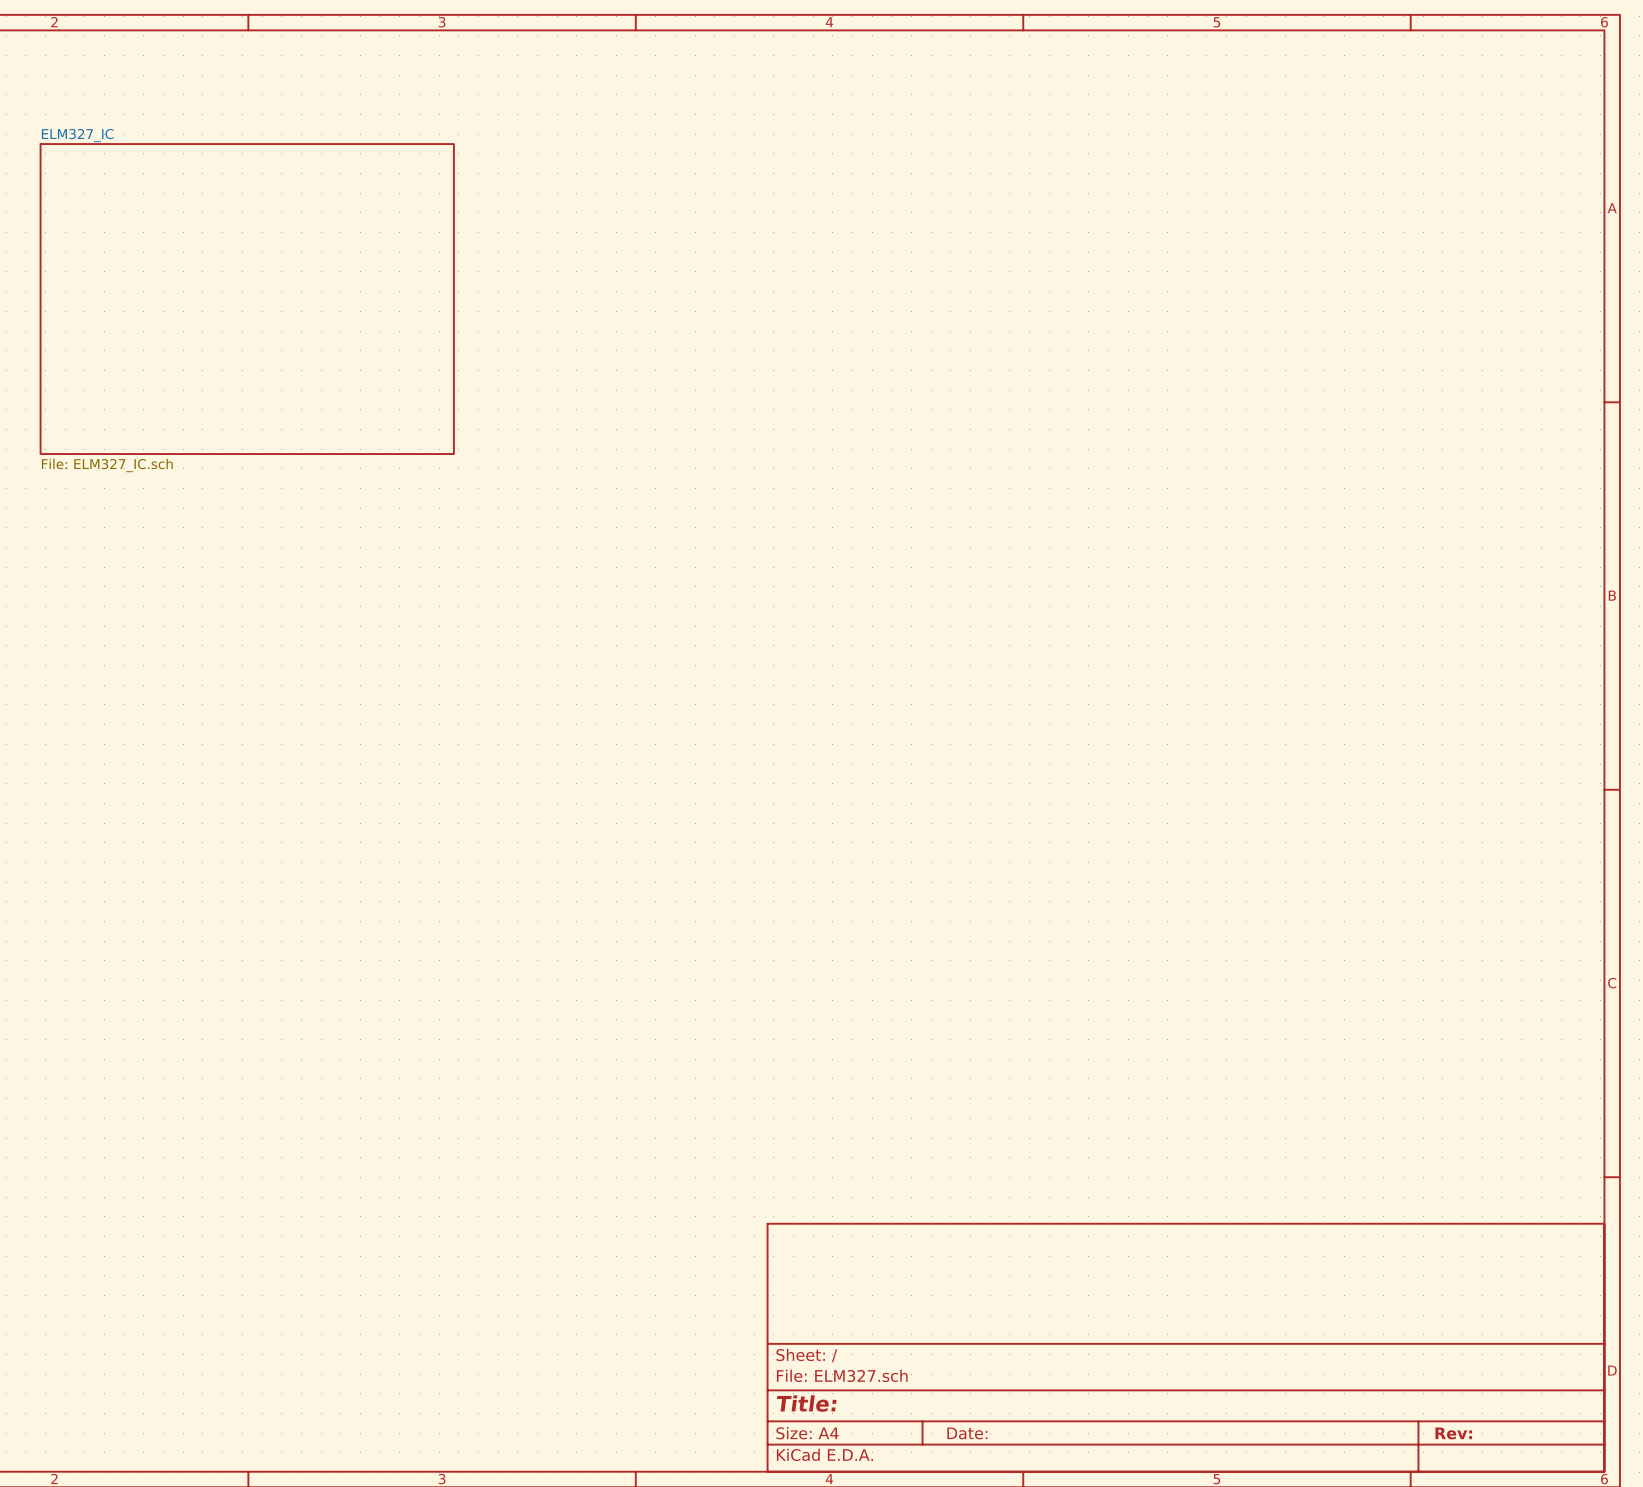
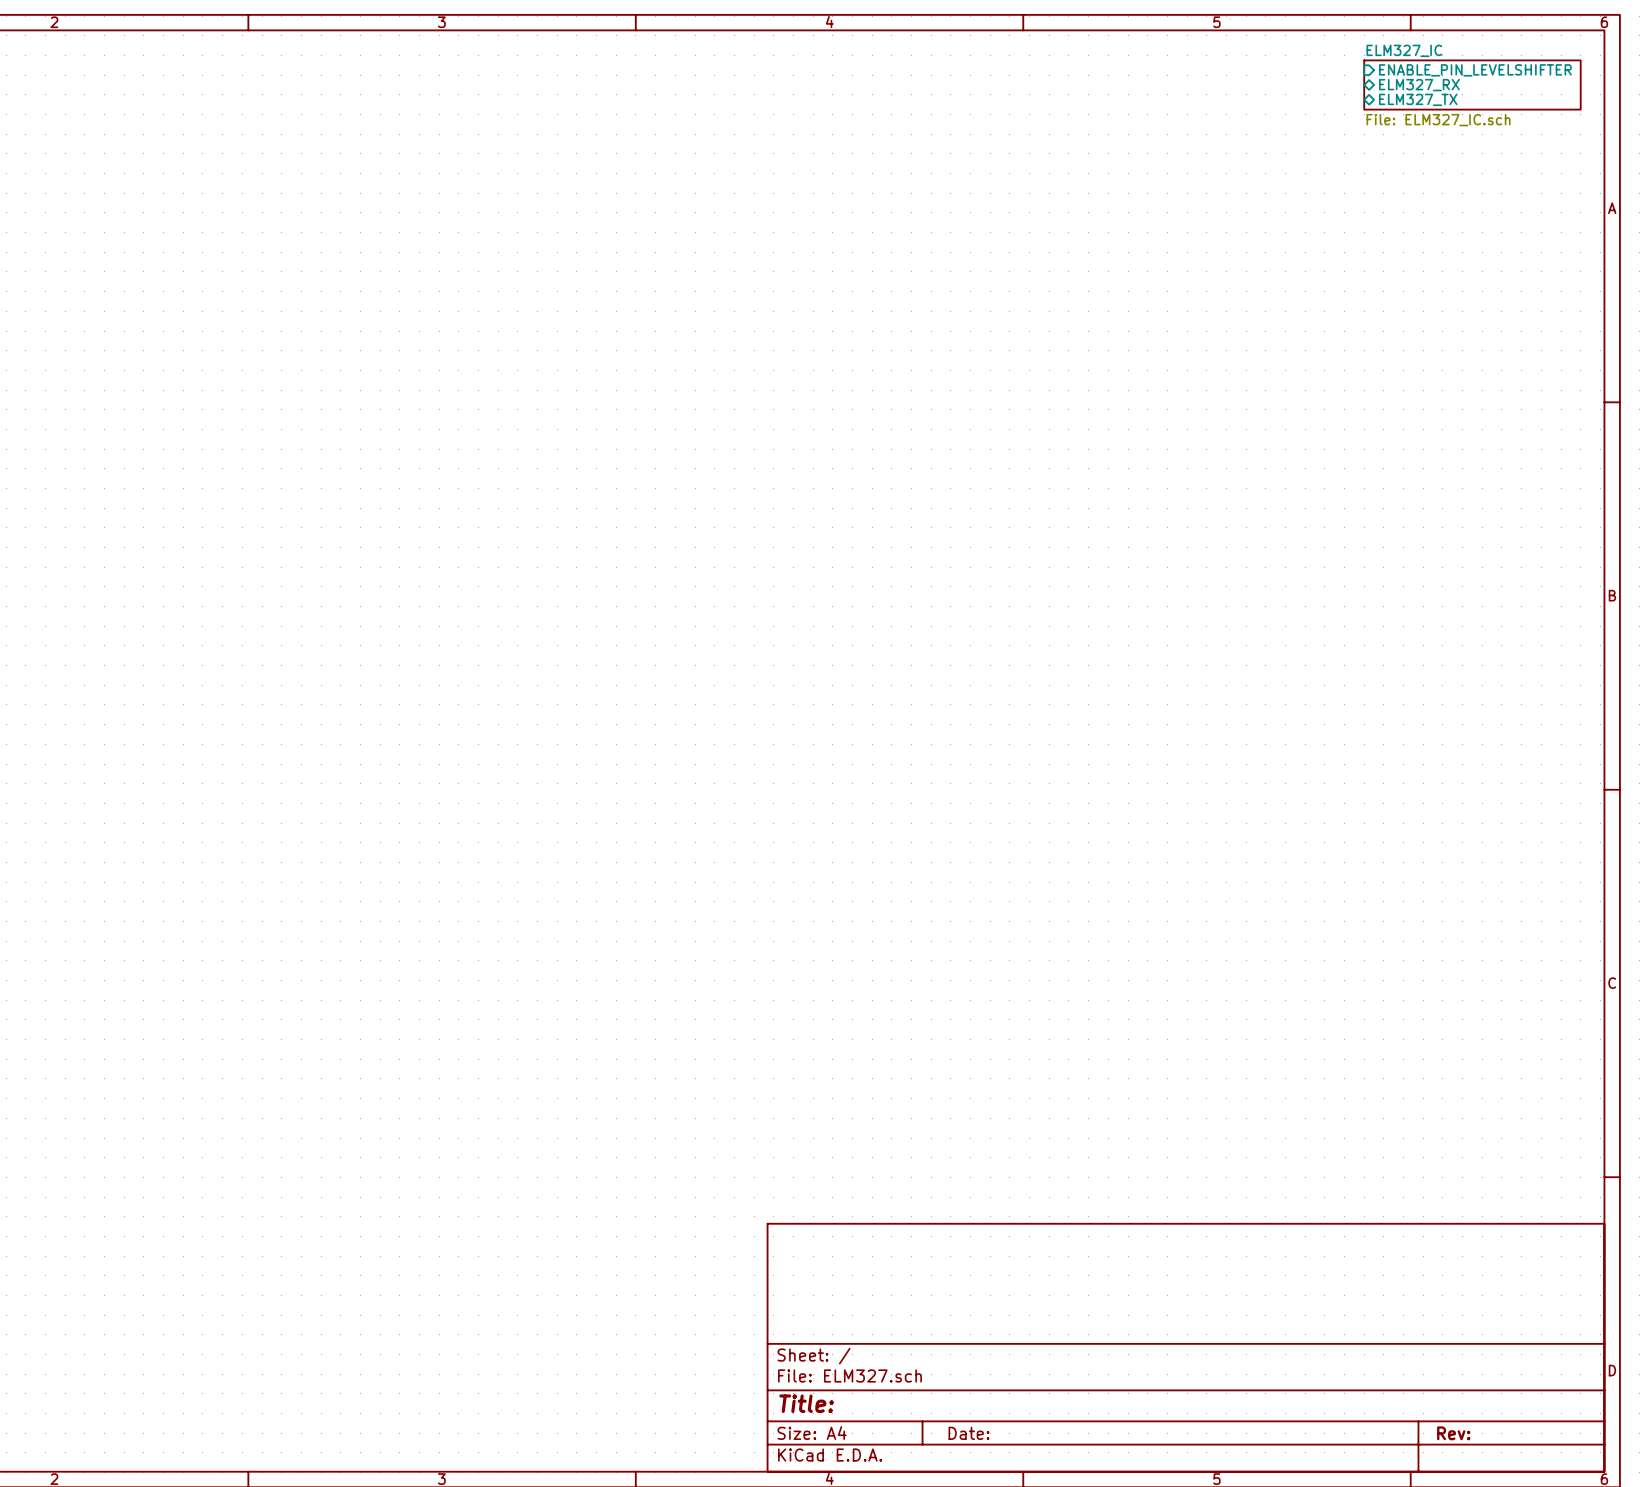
sheet pin: none -> ENABLE_PIN_LEVELSHIFTER (1475, 70)
sheet pin: none -> ELM327_RX (1419, 85)
sheet pin: none -> ELM327_TX (1418, 99)
sheet ELM327_IC name position: ELM327_IC (77, 135) -> ELM327_IC (1404, 50)
sheet ELM327_IC shape: [40, 144, 454, 455] -> [1364, 60, 1581, 110]
sheet ELM327_IC value position: File: ELM327_IC.sch (107, 465) -> File: ELM327_IC.sch (1438, 120)

